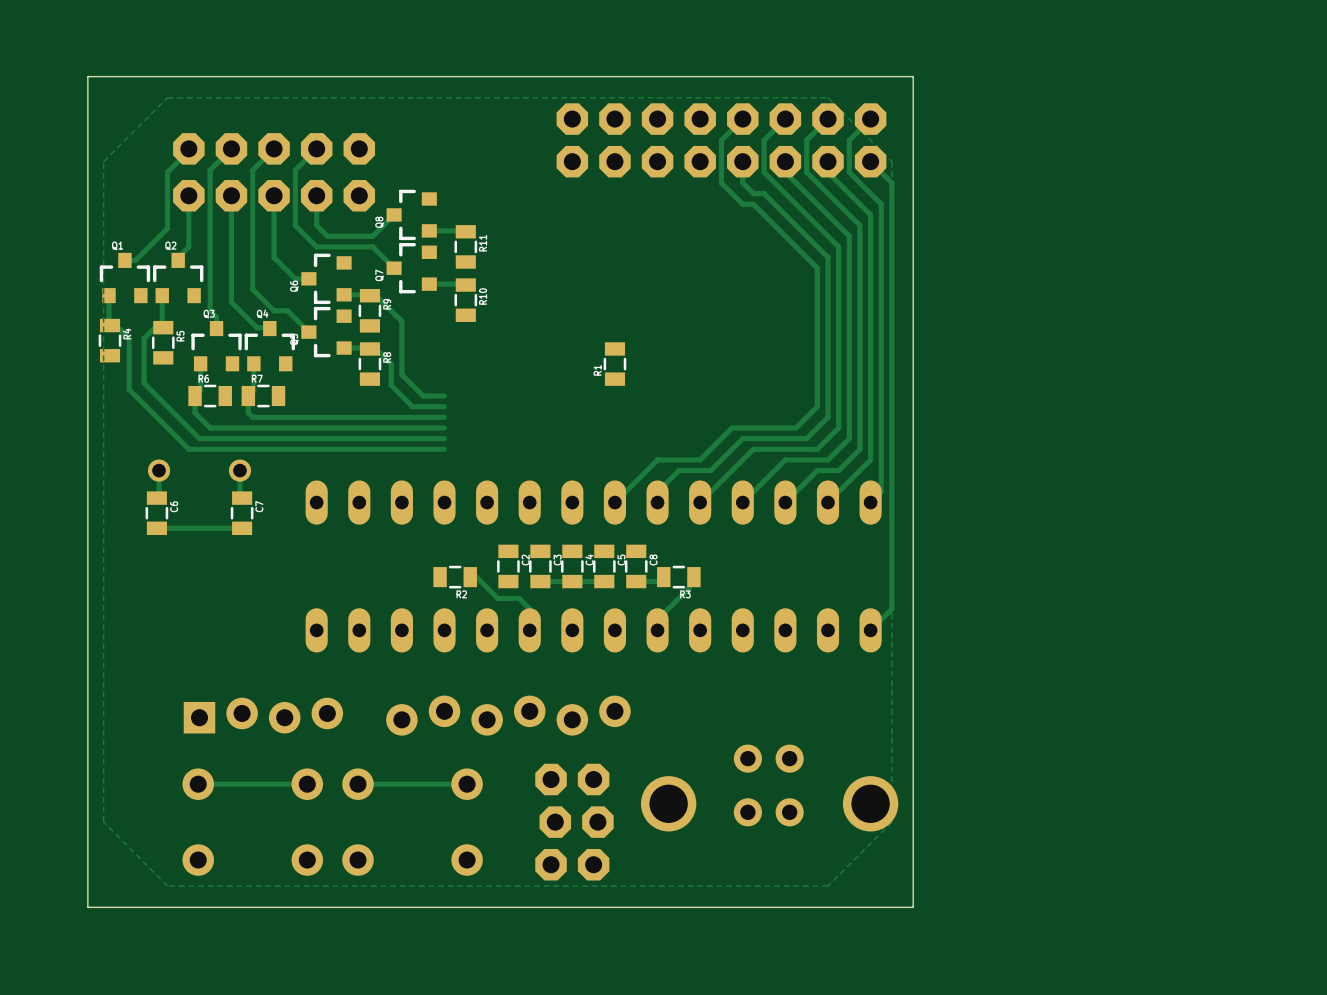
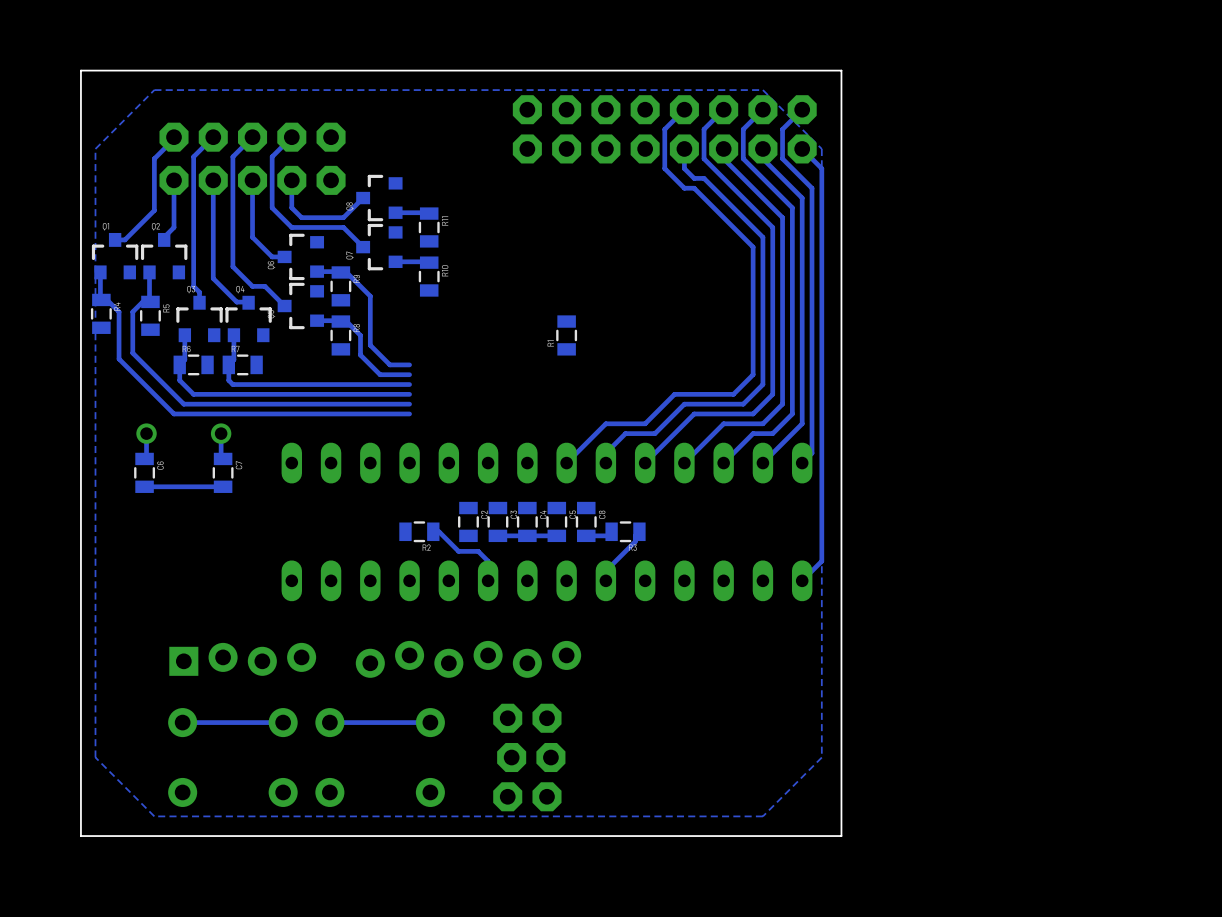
part: (769, 788) -> none

